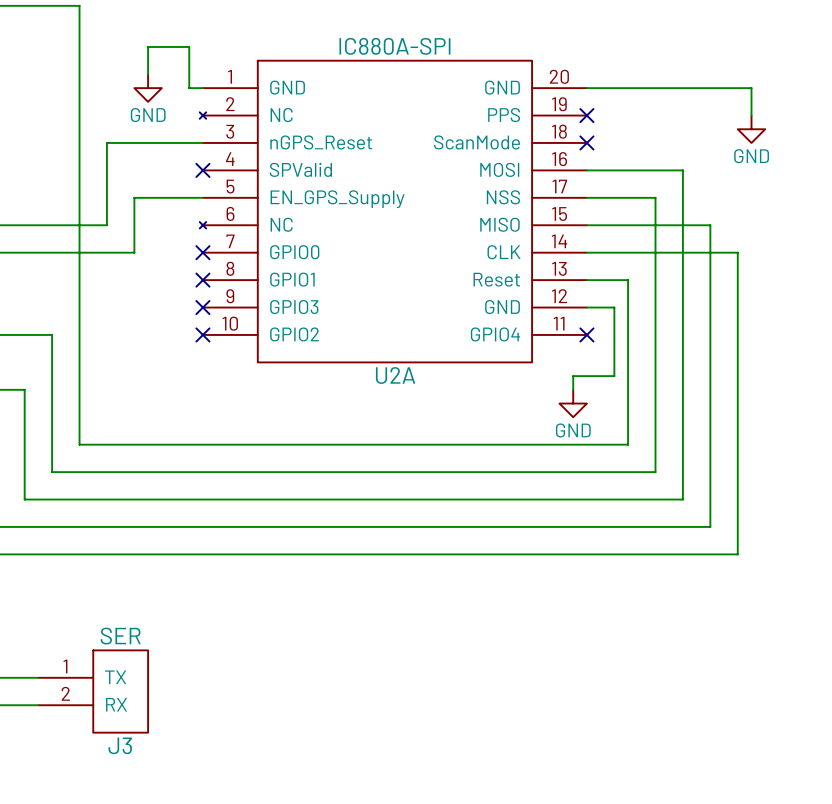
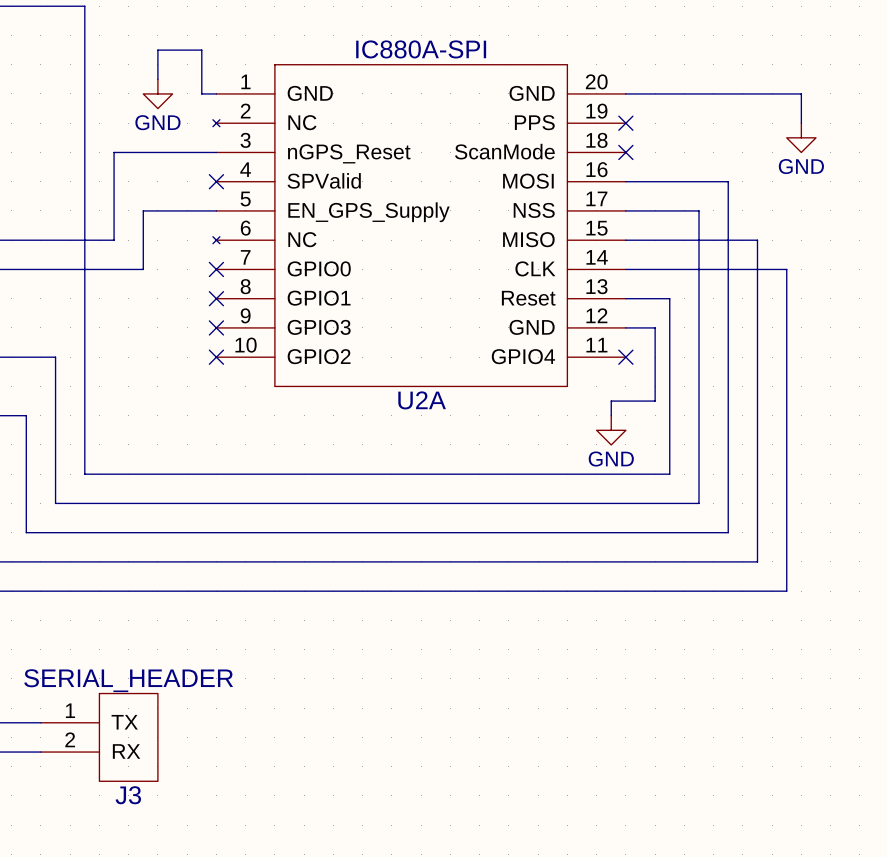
J3 value: SER (120, 636) -> SERIAL_HEADER (128, 680)

